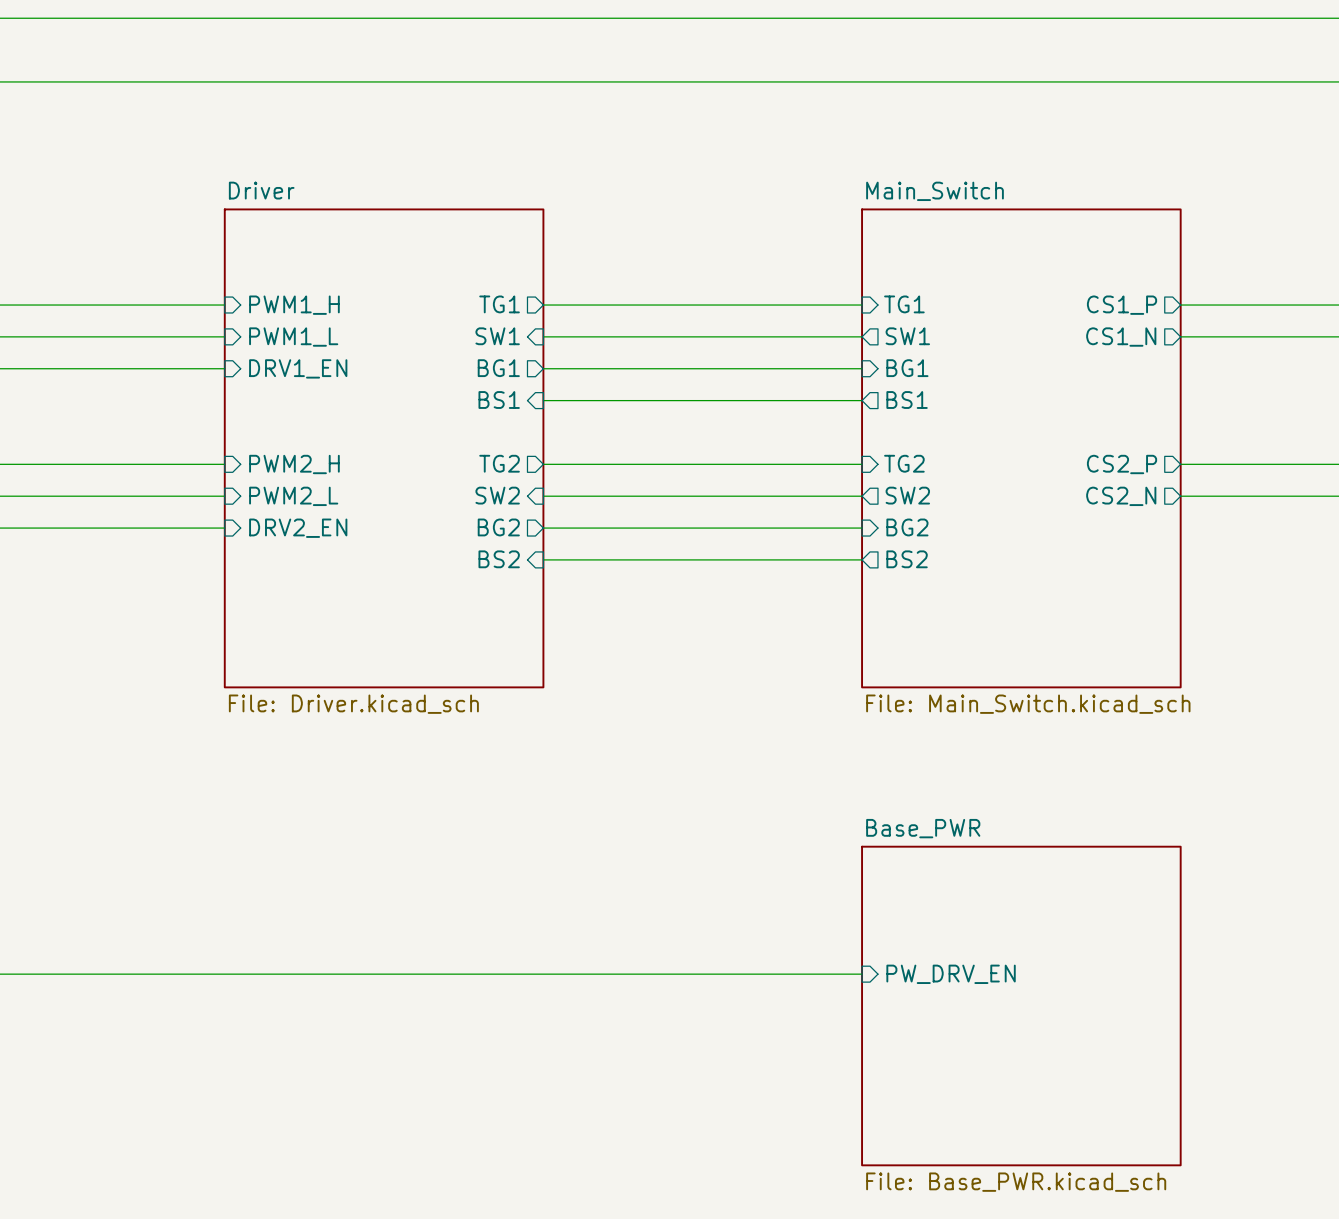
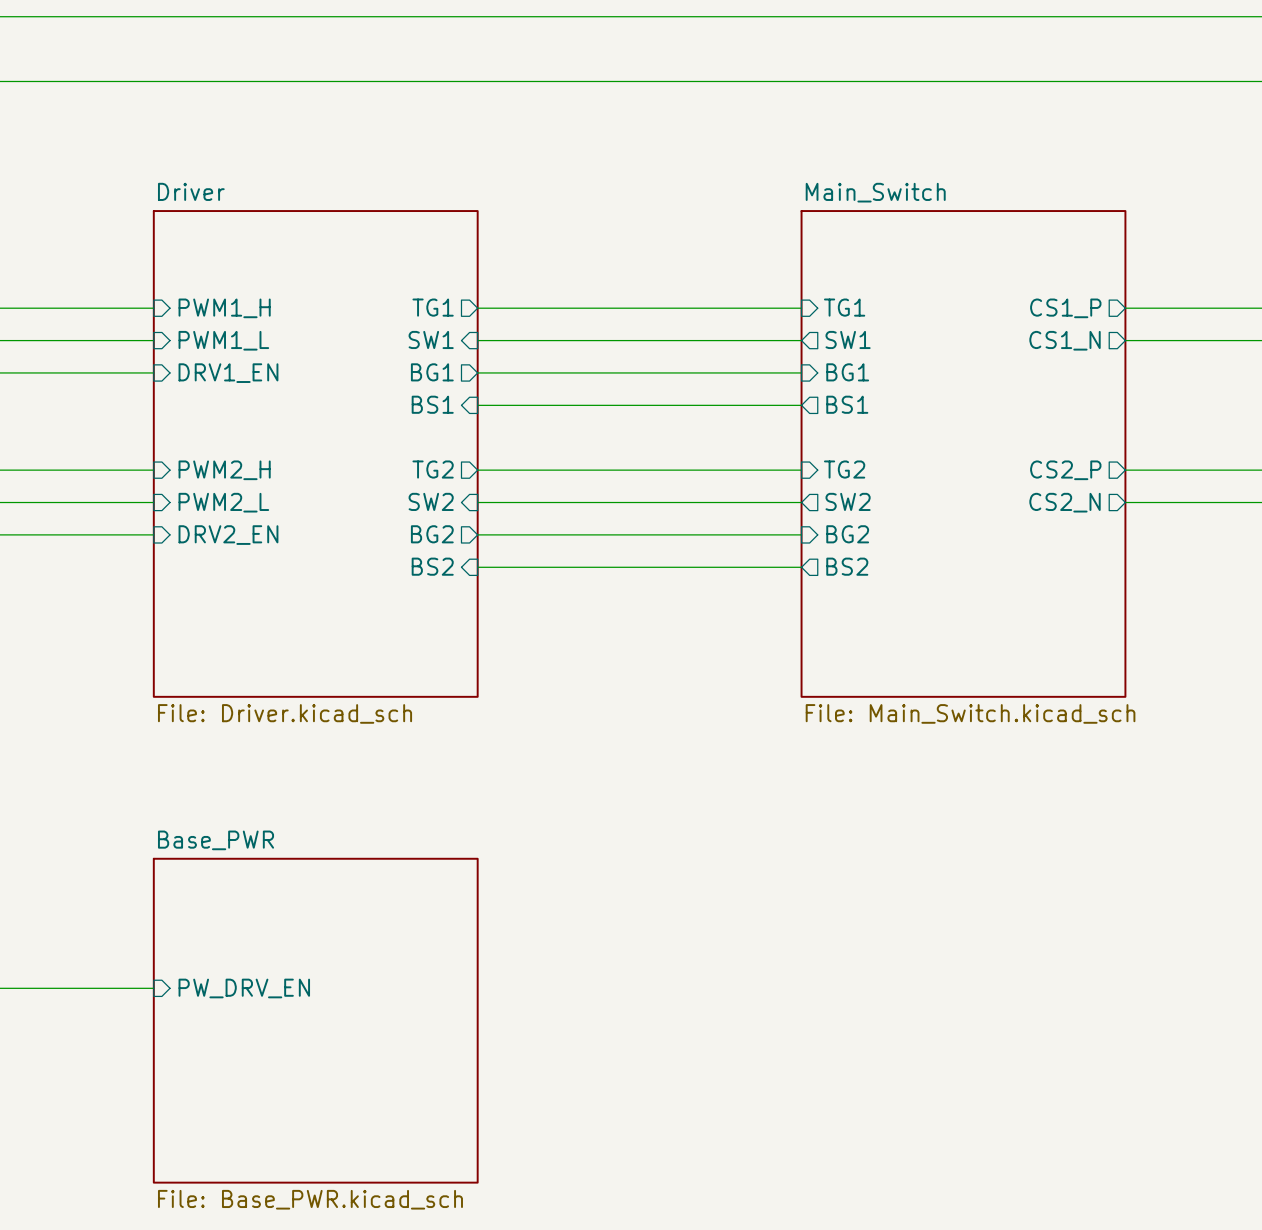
wire: (224, 974) (862, 974) -> none
sheet pin: none -> PW_DRV_EN (244, 988)
sheet pin: PW_DRV_EN (951, 974) -> none
sheet Base_PWR: none -> File: Base_PWR.kicad_sch (315, 1020)
sheet Base_PWR: File: Base_PWR.kicad_sch (1021, 1006) -> none

